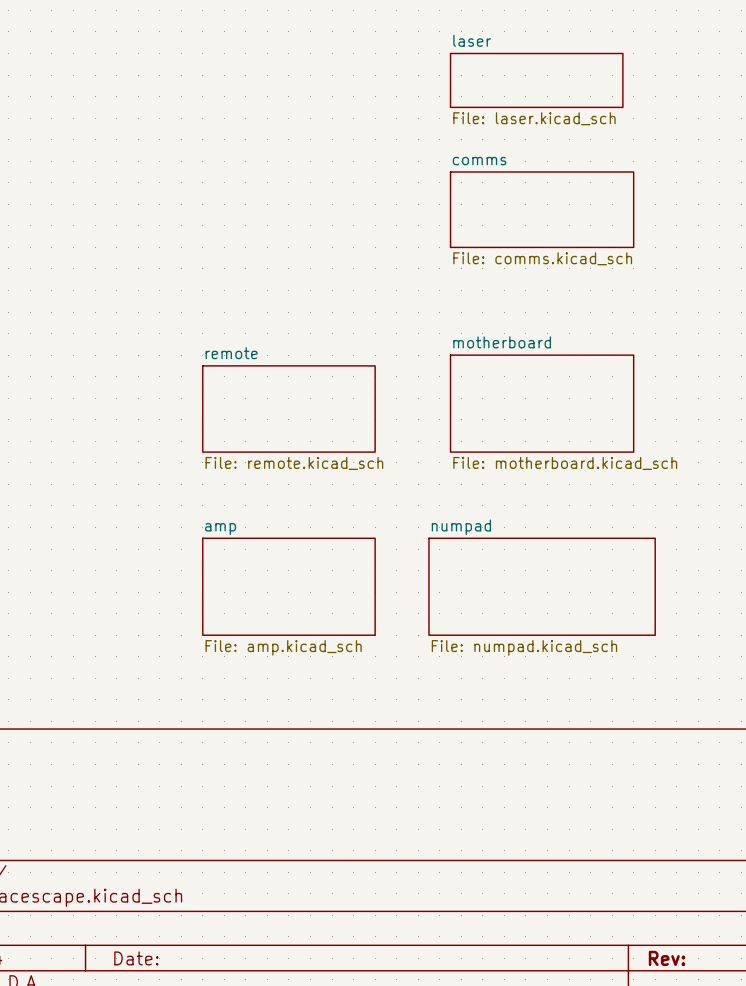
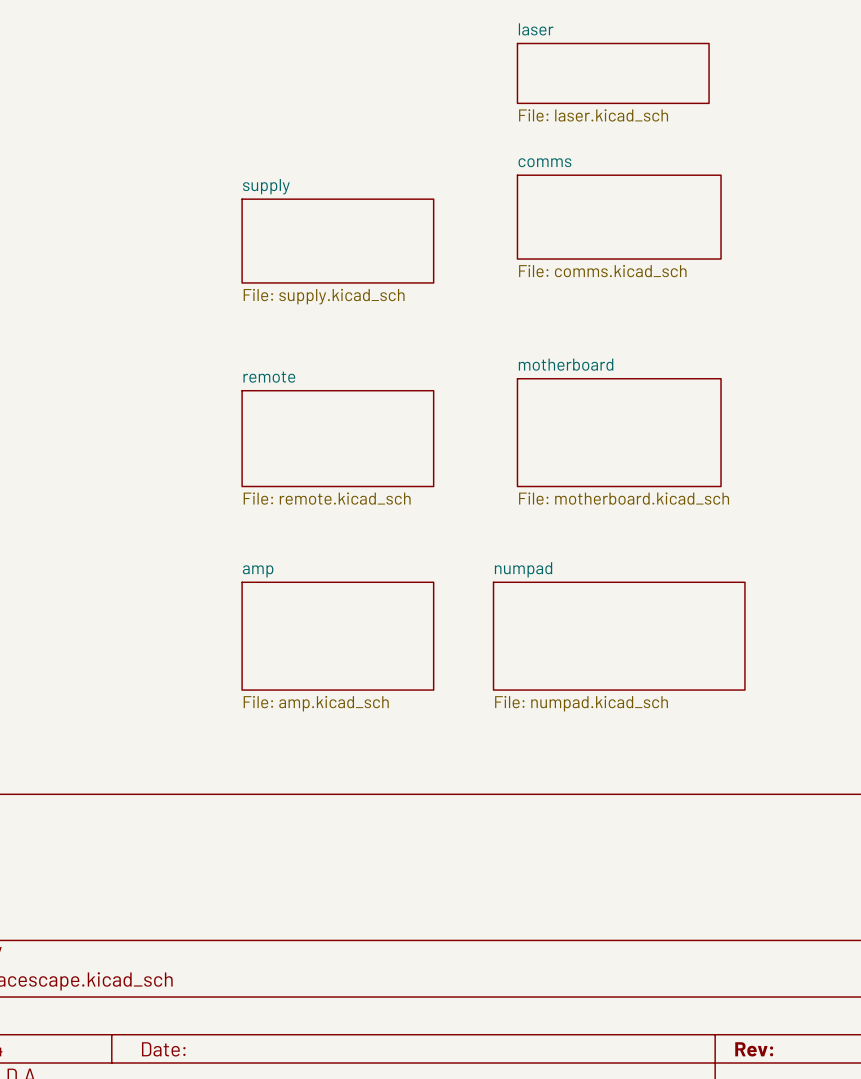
sheet supply: none -> File: supply.kicad_sch (337, 241)

